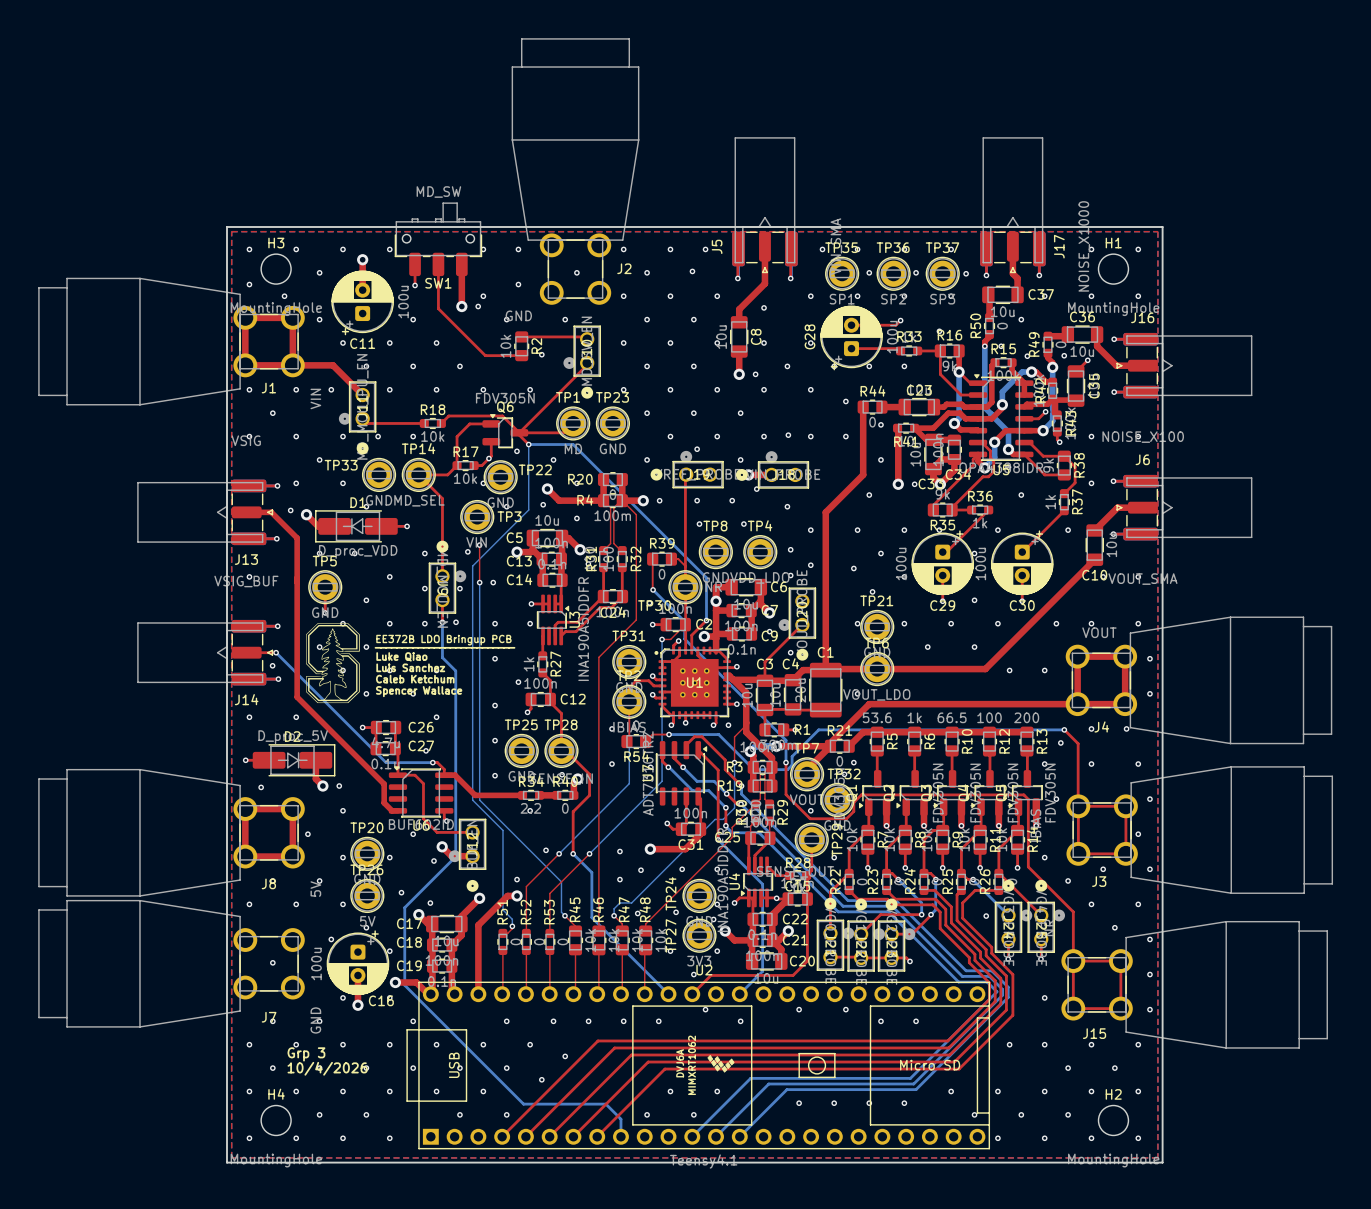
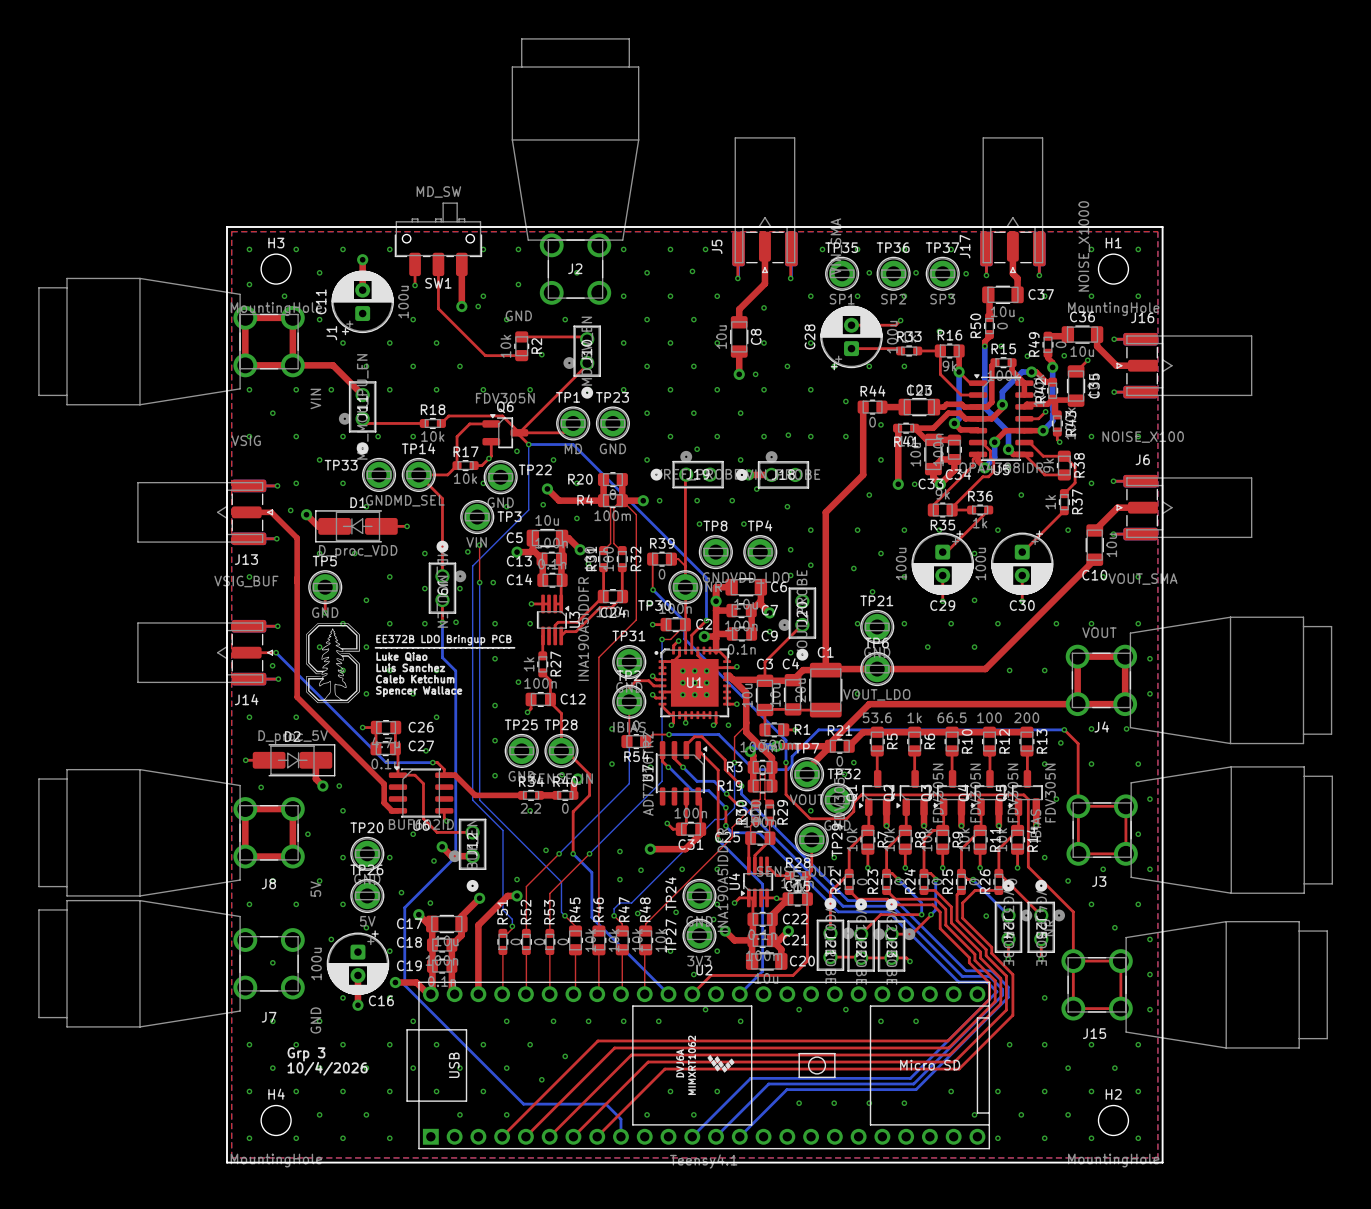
J17 name position: J17 (1059, 246) -> J17 (965, 246)
J2 name position: J2 (624, 268) -> J2 (575, 268)
C11 name rotation: 0° (362, 343) -> 90° counterclockwise (321, 301)
C11 name position: C11 (362, 343) -> C11 (321, 301)
J1 name rotation: 0° (268, 388) -> 90° counterclockwise (331, 333)
J1 name position: J1 (268, 388) -> J1 (331, 333)

